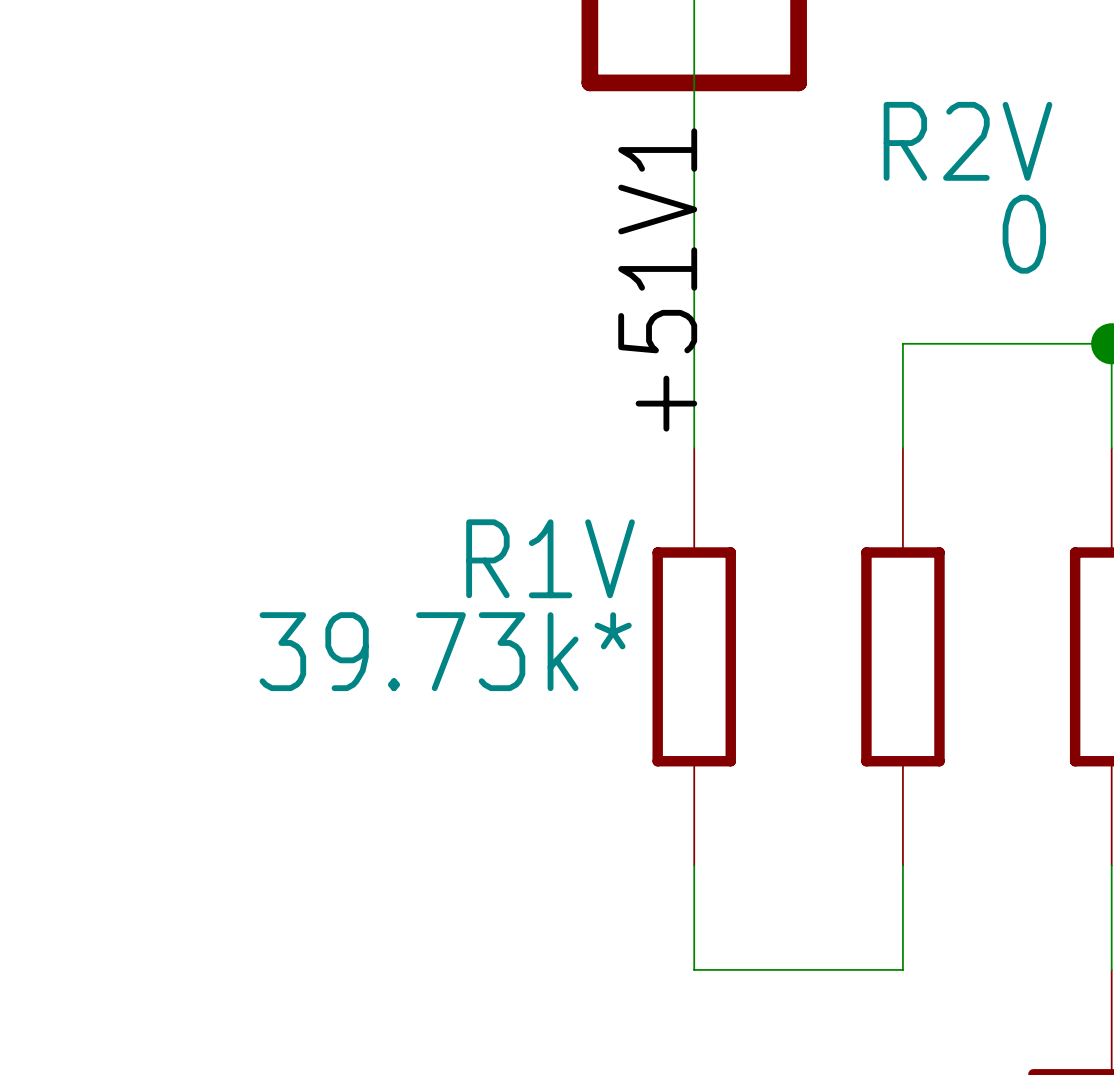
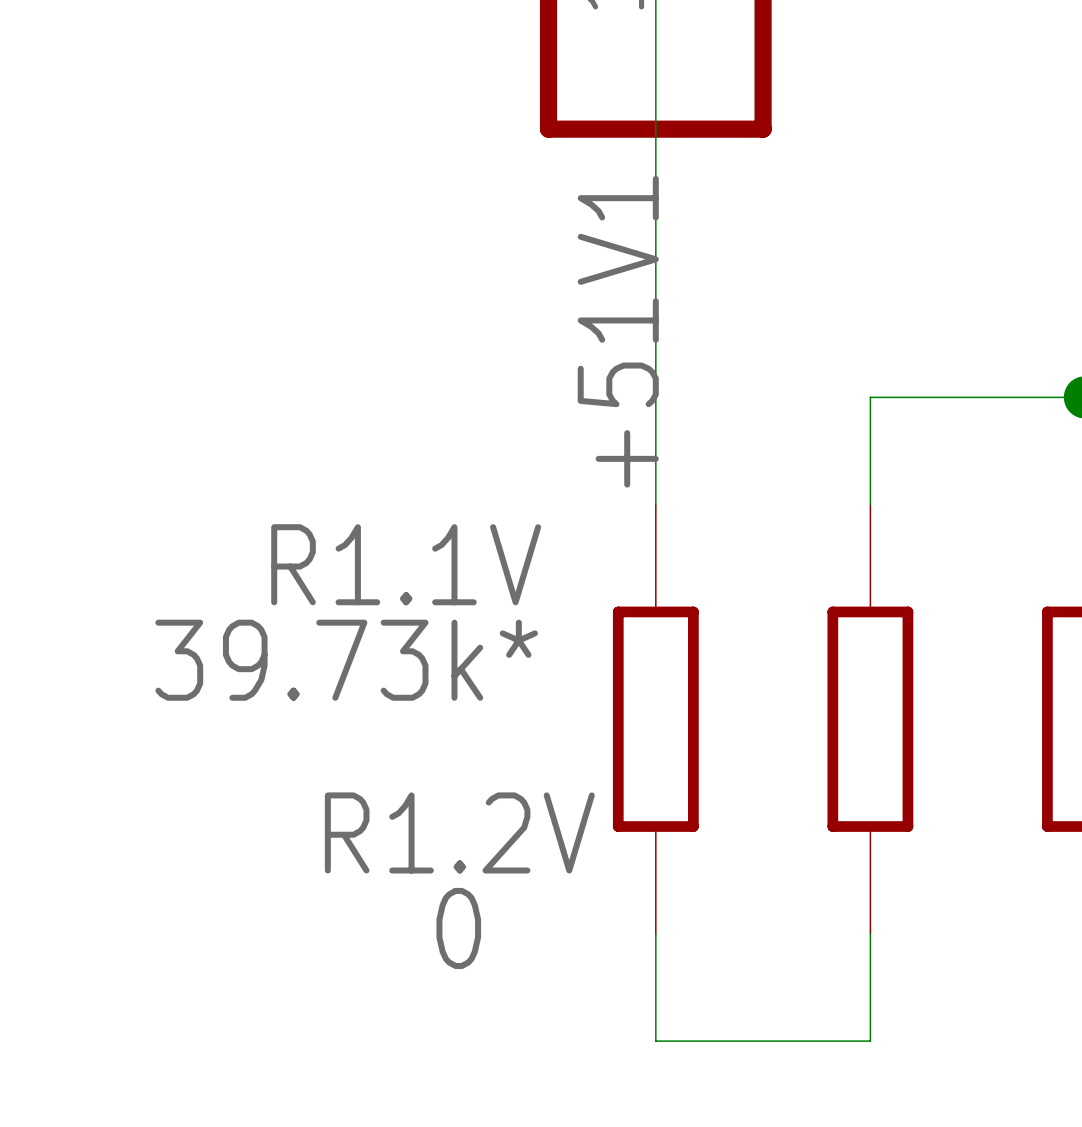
R2V name: R2V (967, 141) -> R1.2V (459, 832)
R2V value position: 0 (1024, 234) -> 0 (458, 928)
R1V name: R1V (550, 558) -> R1.1V (406, 564)
R1V value position: 39.73k* (445, 651) -> 39.73k* (346, 660)

